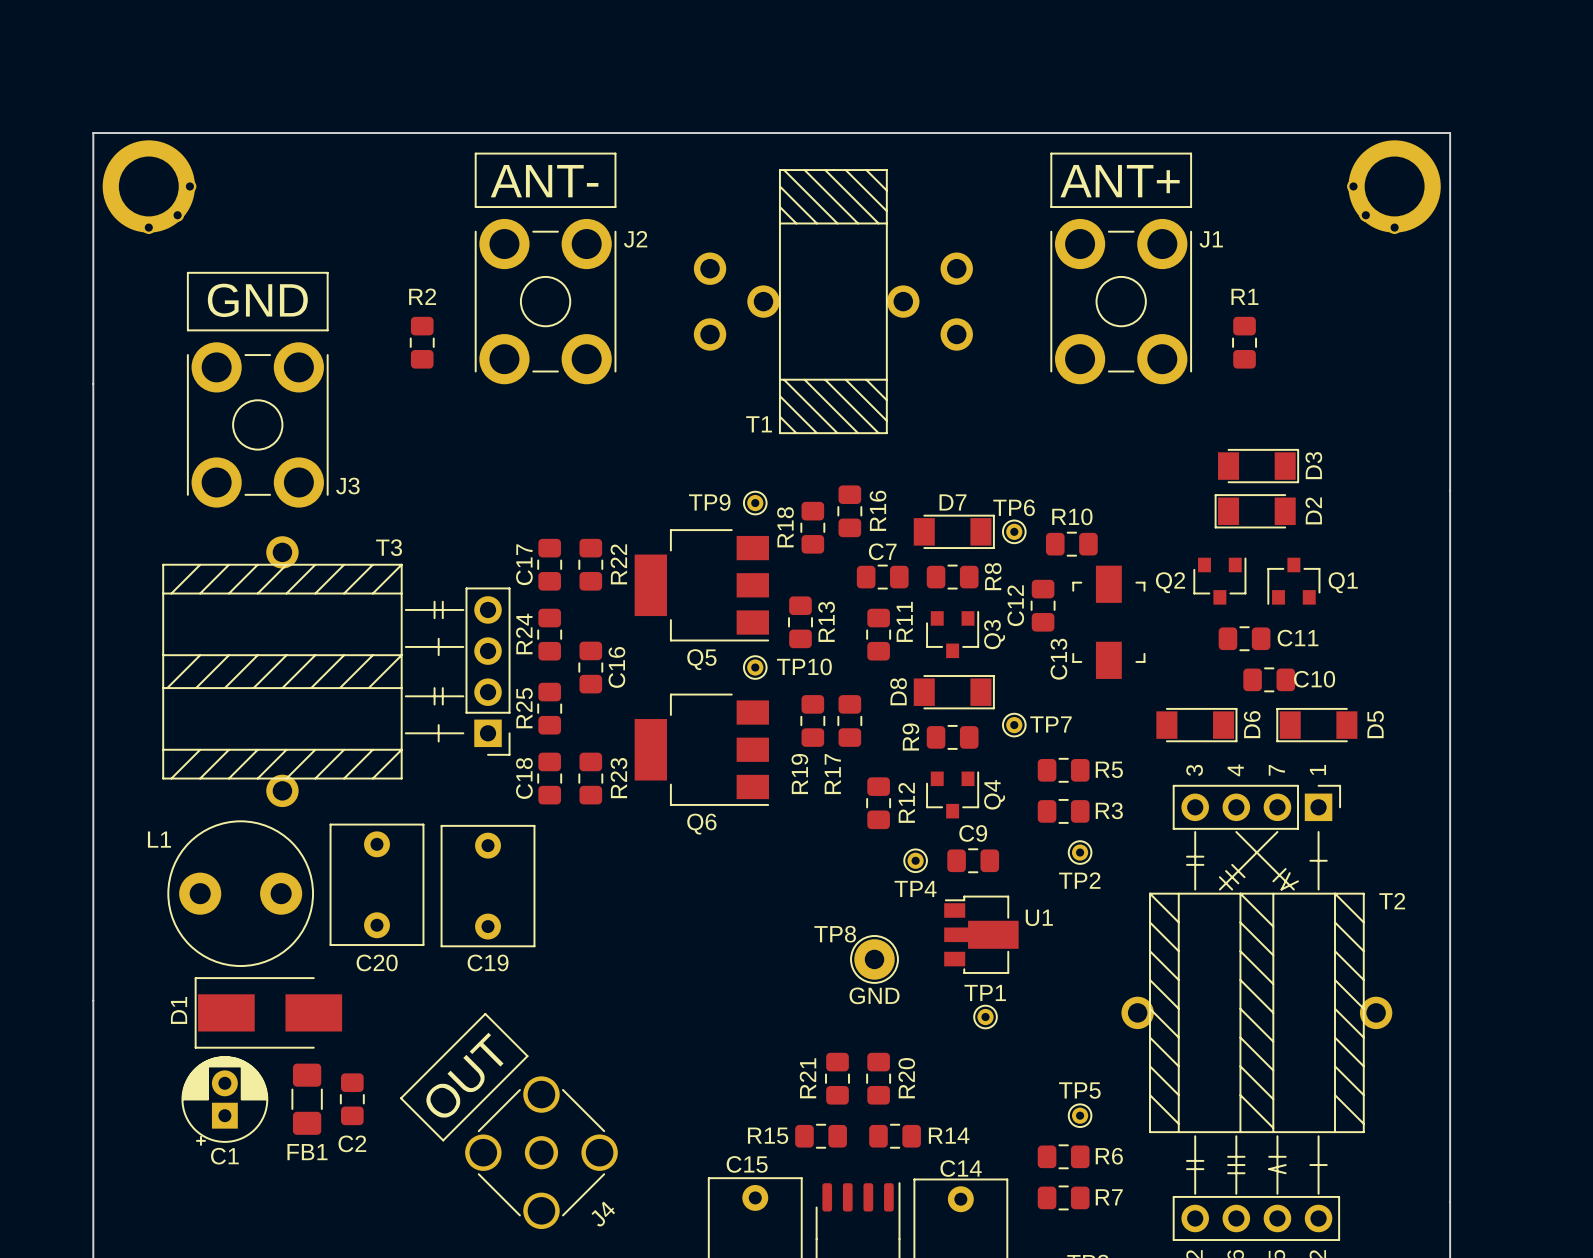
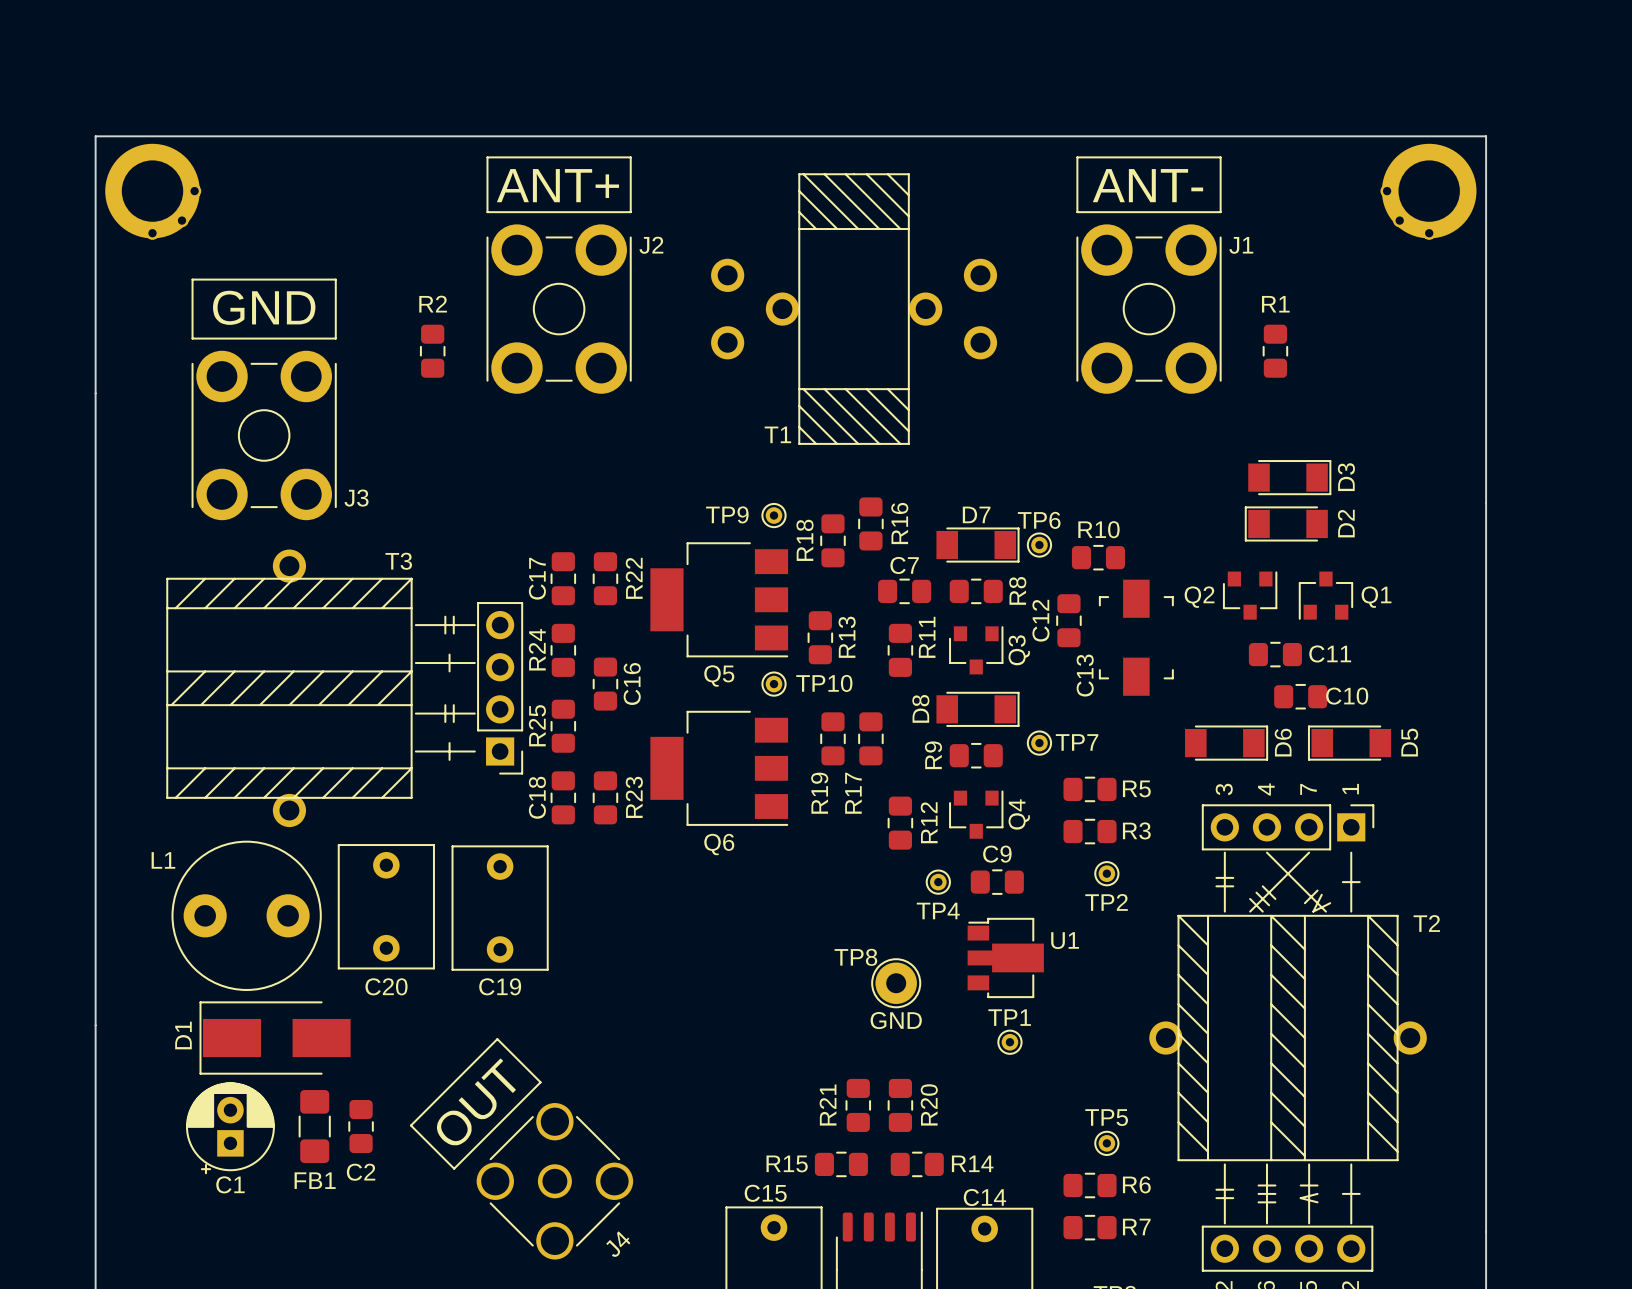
text: ANT- (544, 181) -> ANT+ (557, 185)
text: ANT+ (1120, 181) -> ANT- (1147, 185)

